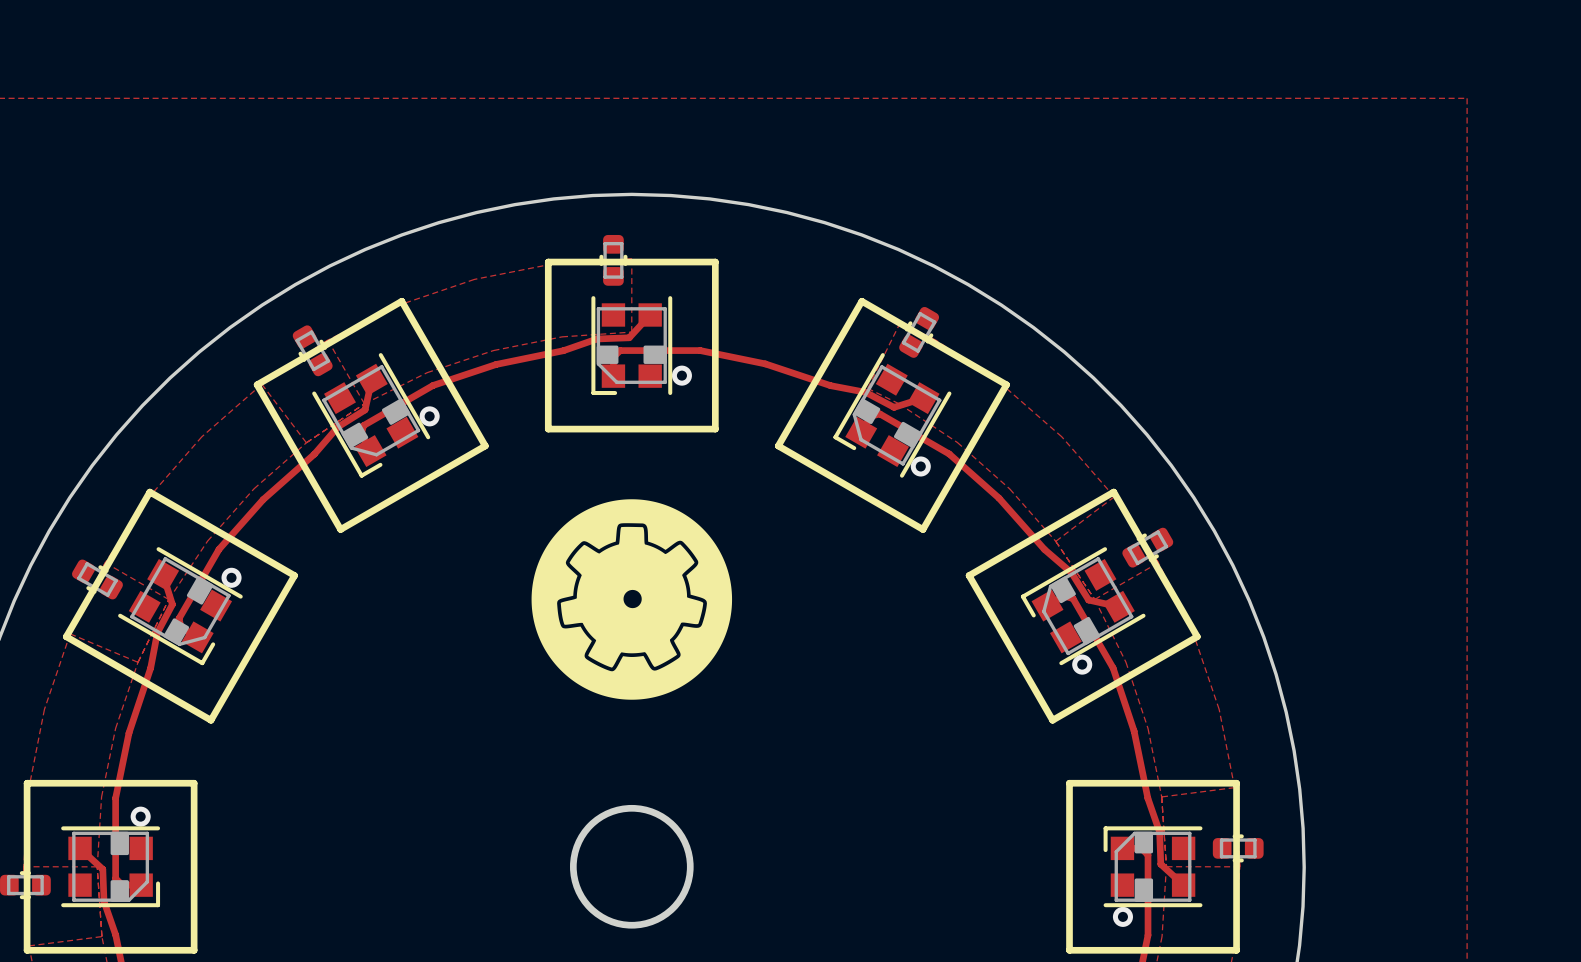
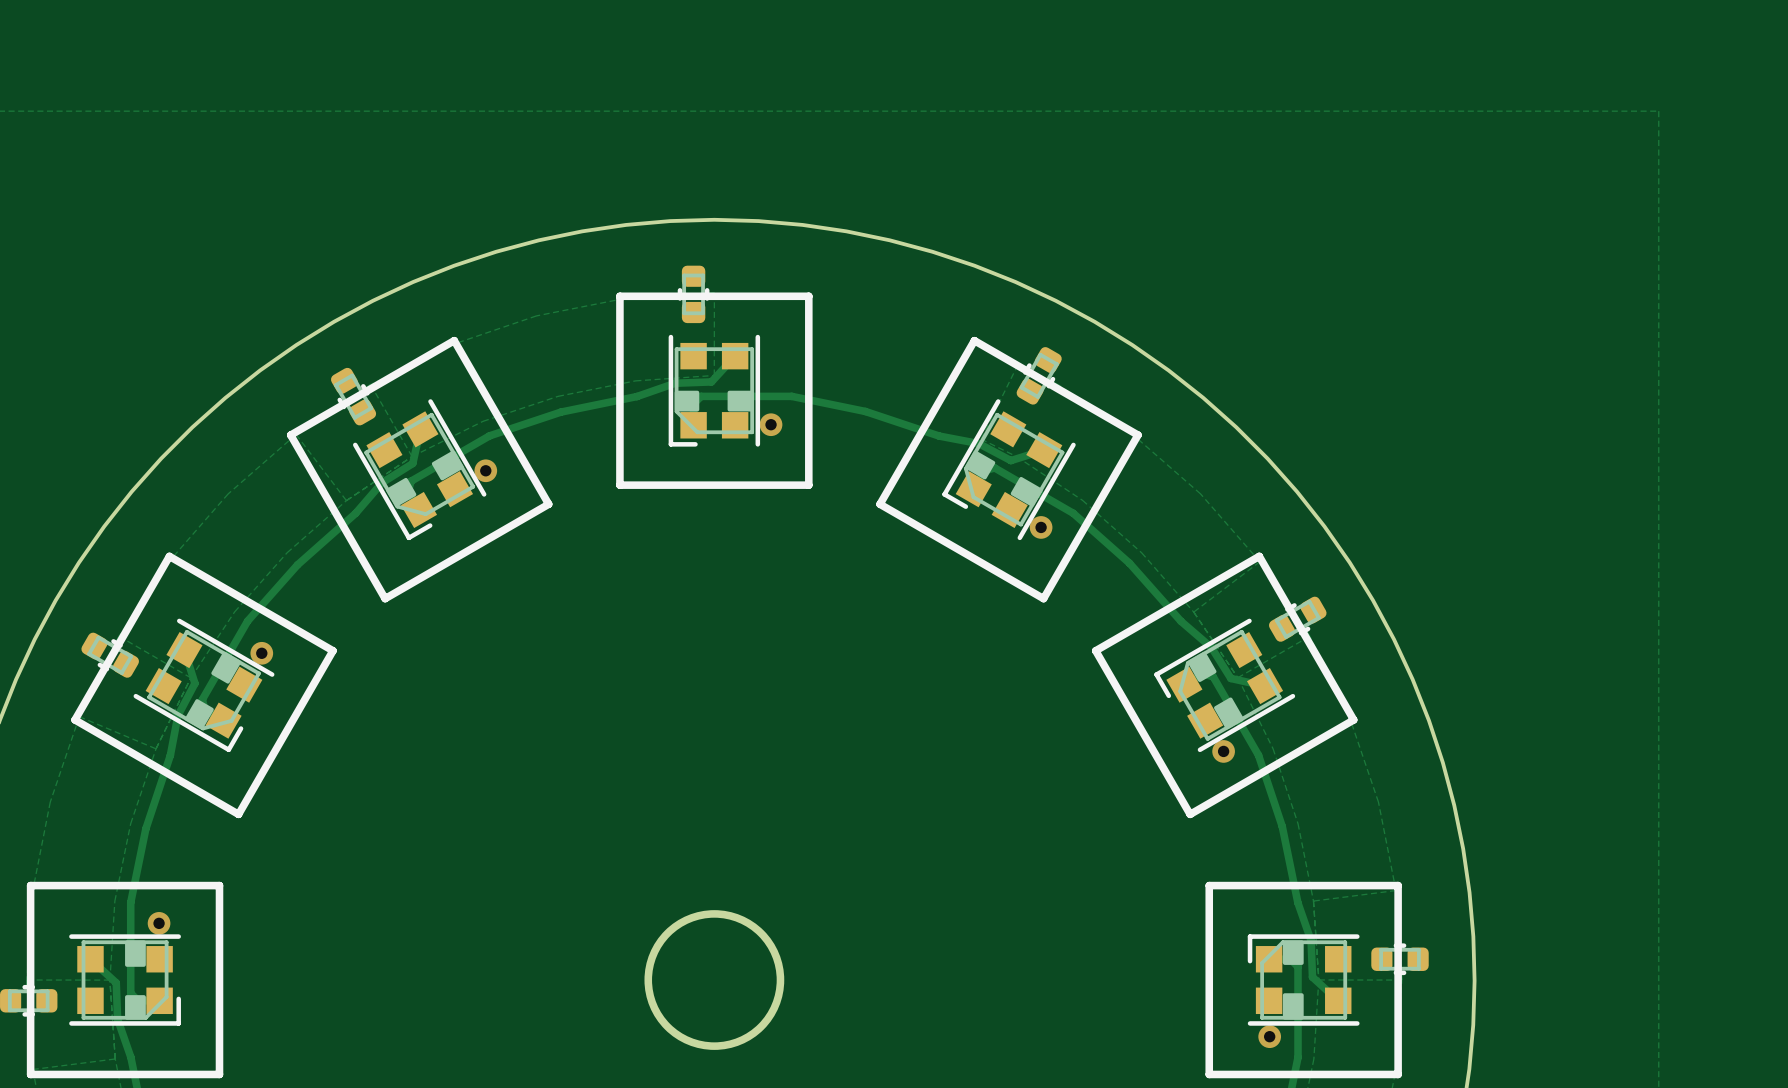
drawing: [531, 499, 733, 700] -> none

